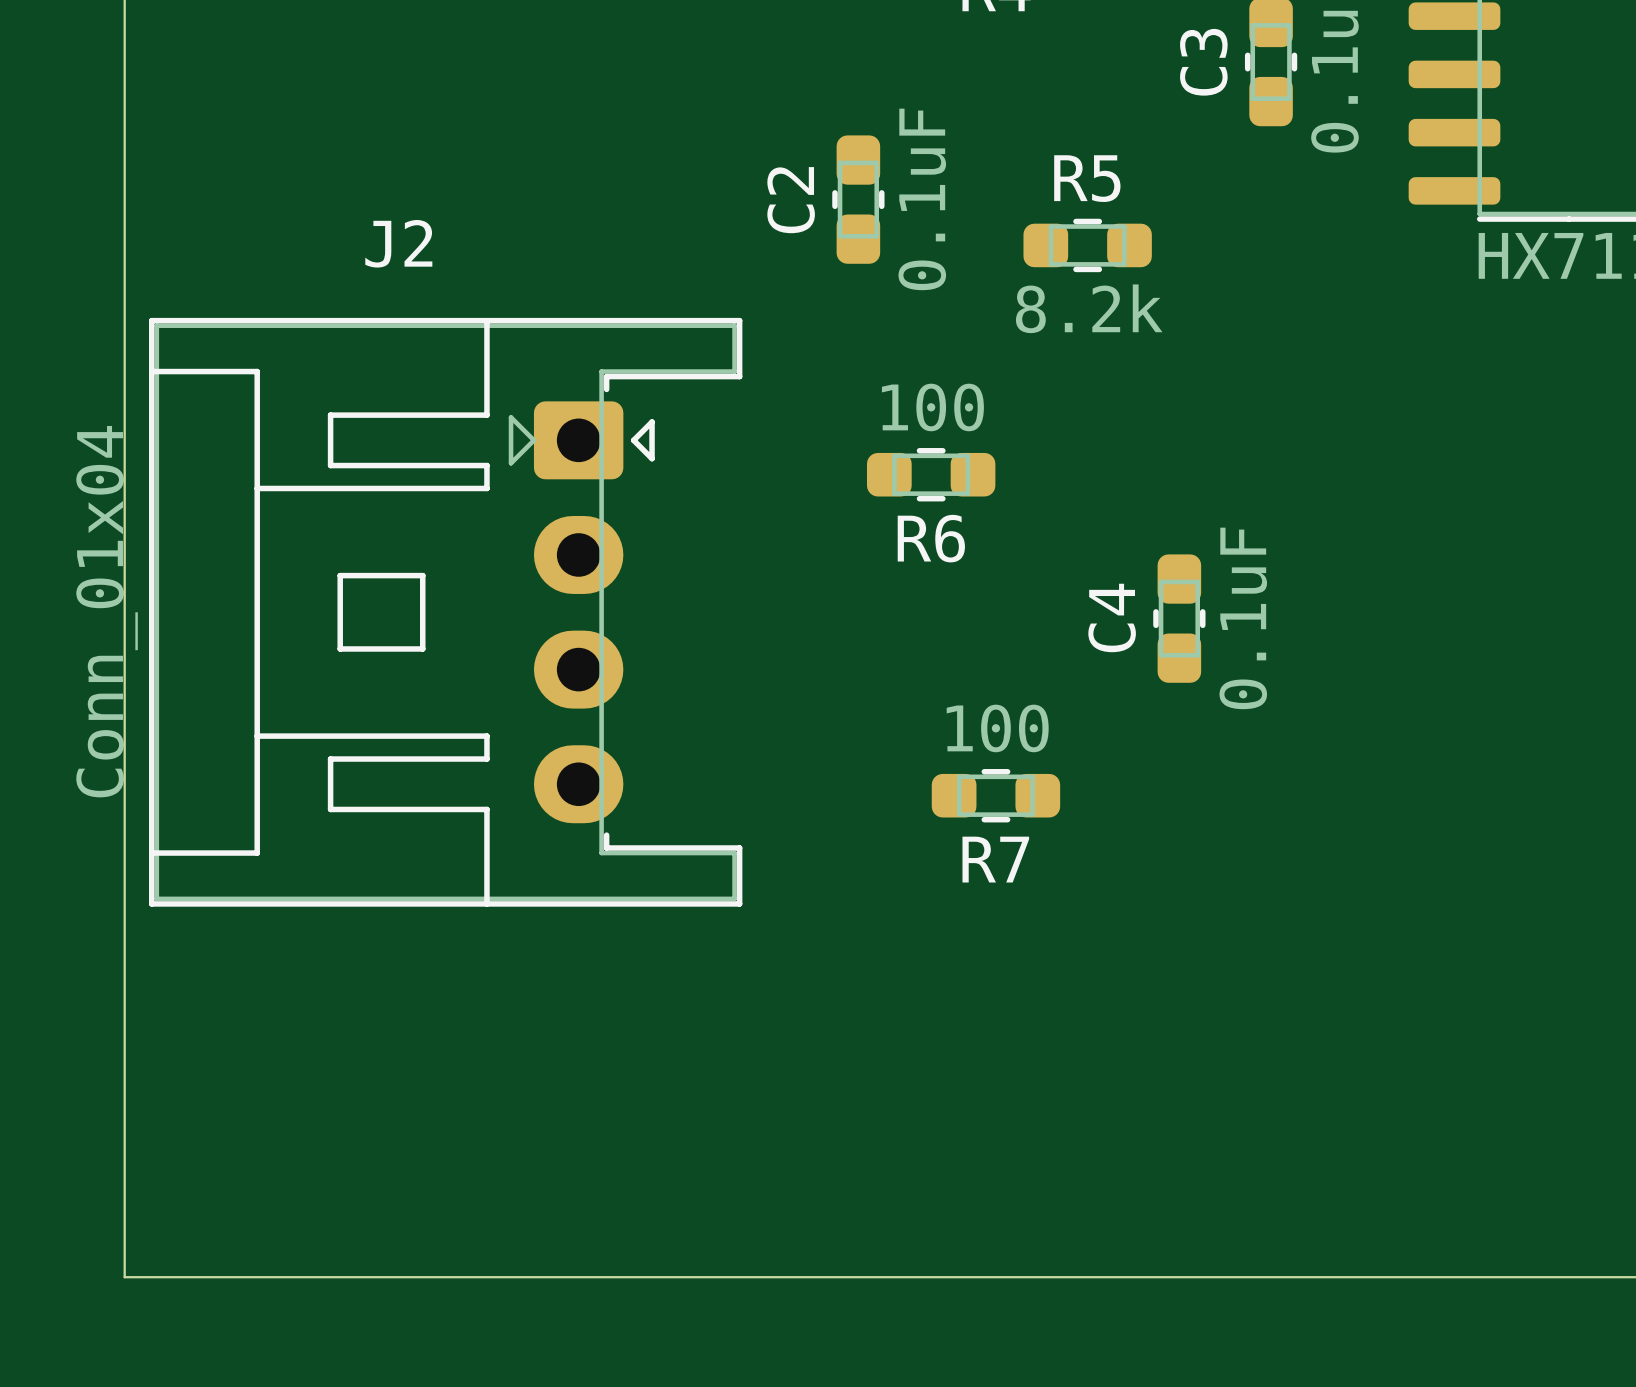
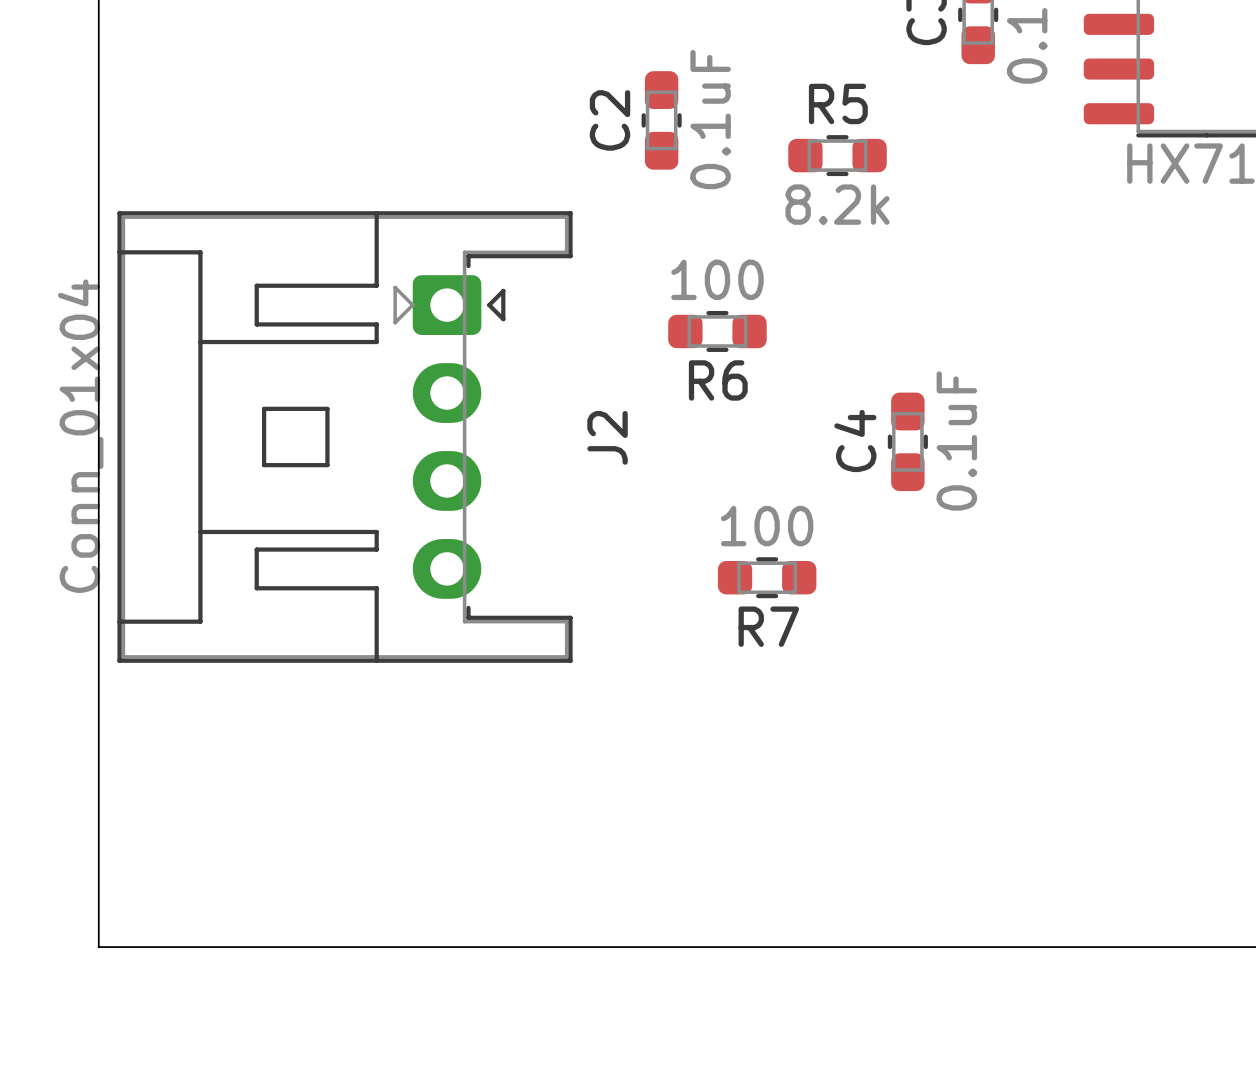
J2 name rotation: 0° (398, 243) -> 90° counterclockwise (607, 437)
J2 name position: J2 (398, 243) -> J2 (607, 437)

